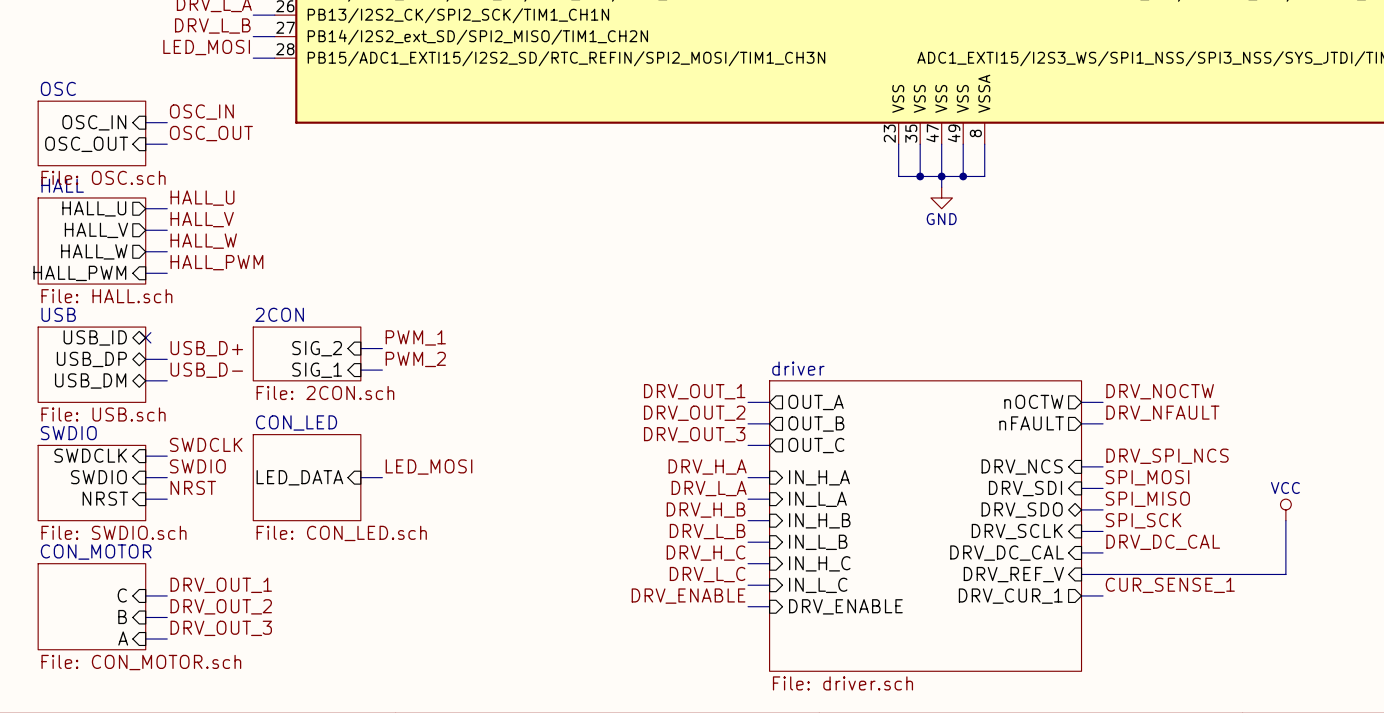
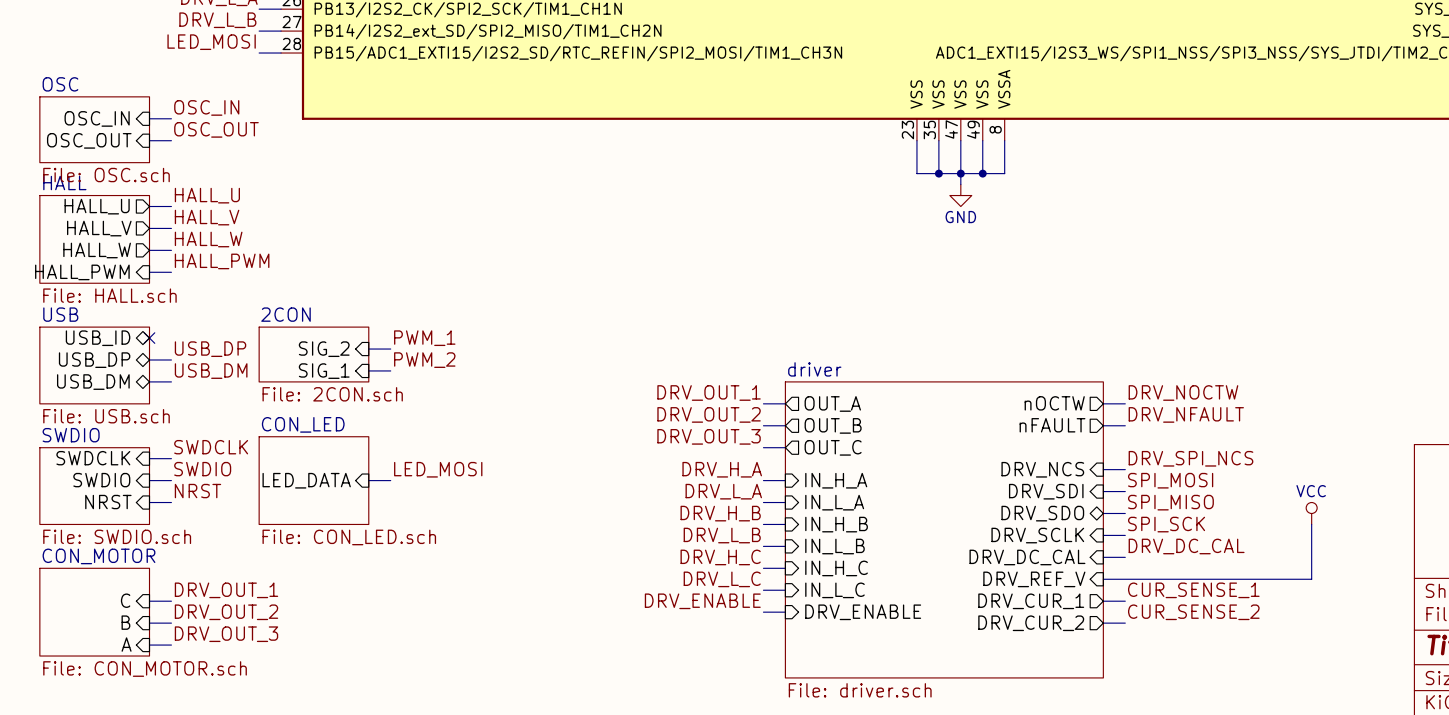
label: USB_D+ (206, 348) -> USB_DP (210, 349)
label: USB_D- (206, 370) -> USB_DM (211, 371)
label: none -> CUR_SENSE_2 (1193, 612)
sheet pin: none -> DRV_CUR_2 (1031, 623)
wire: none -> (1103, 623) (1125, 623)

